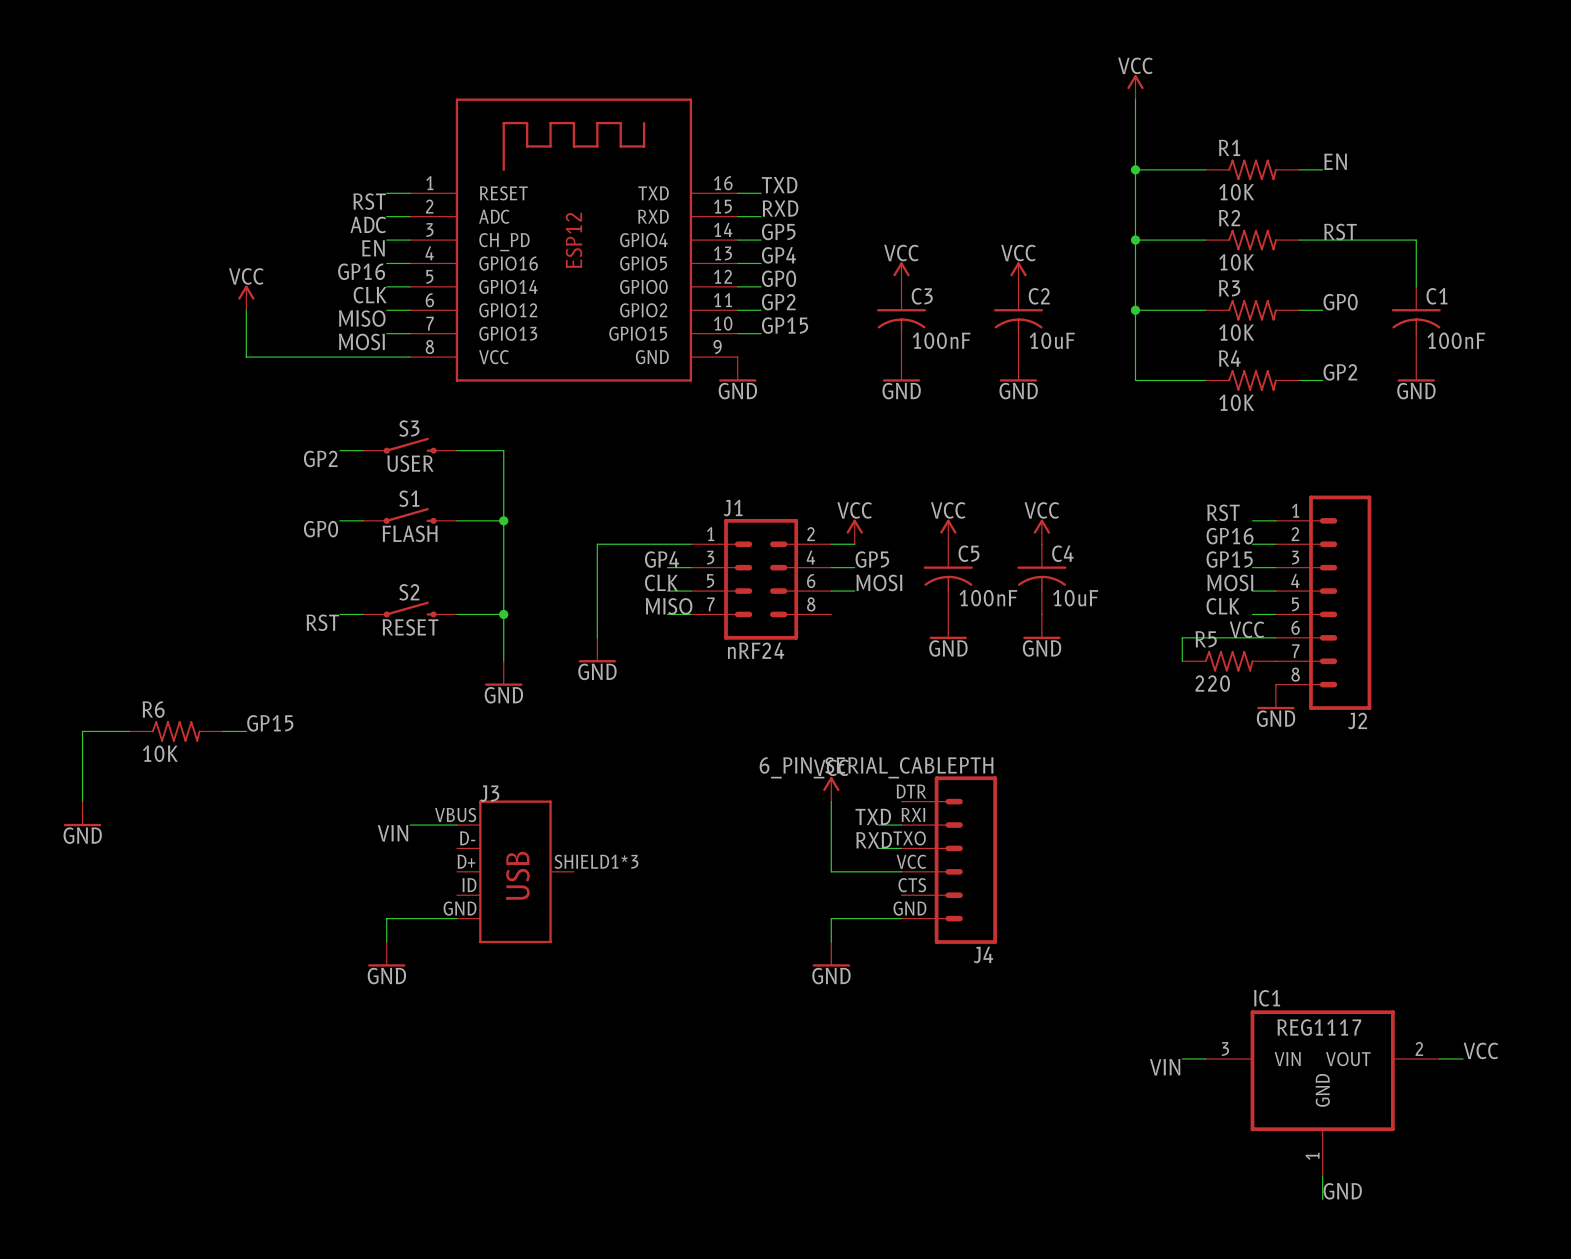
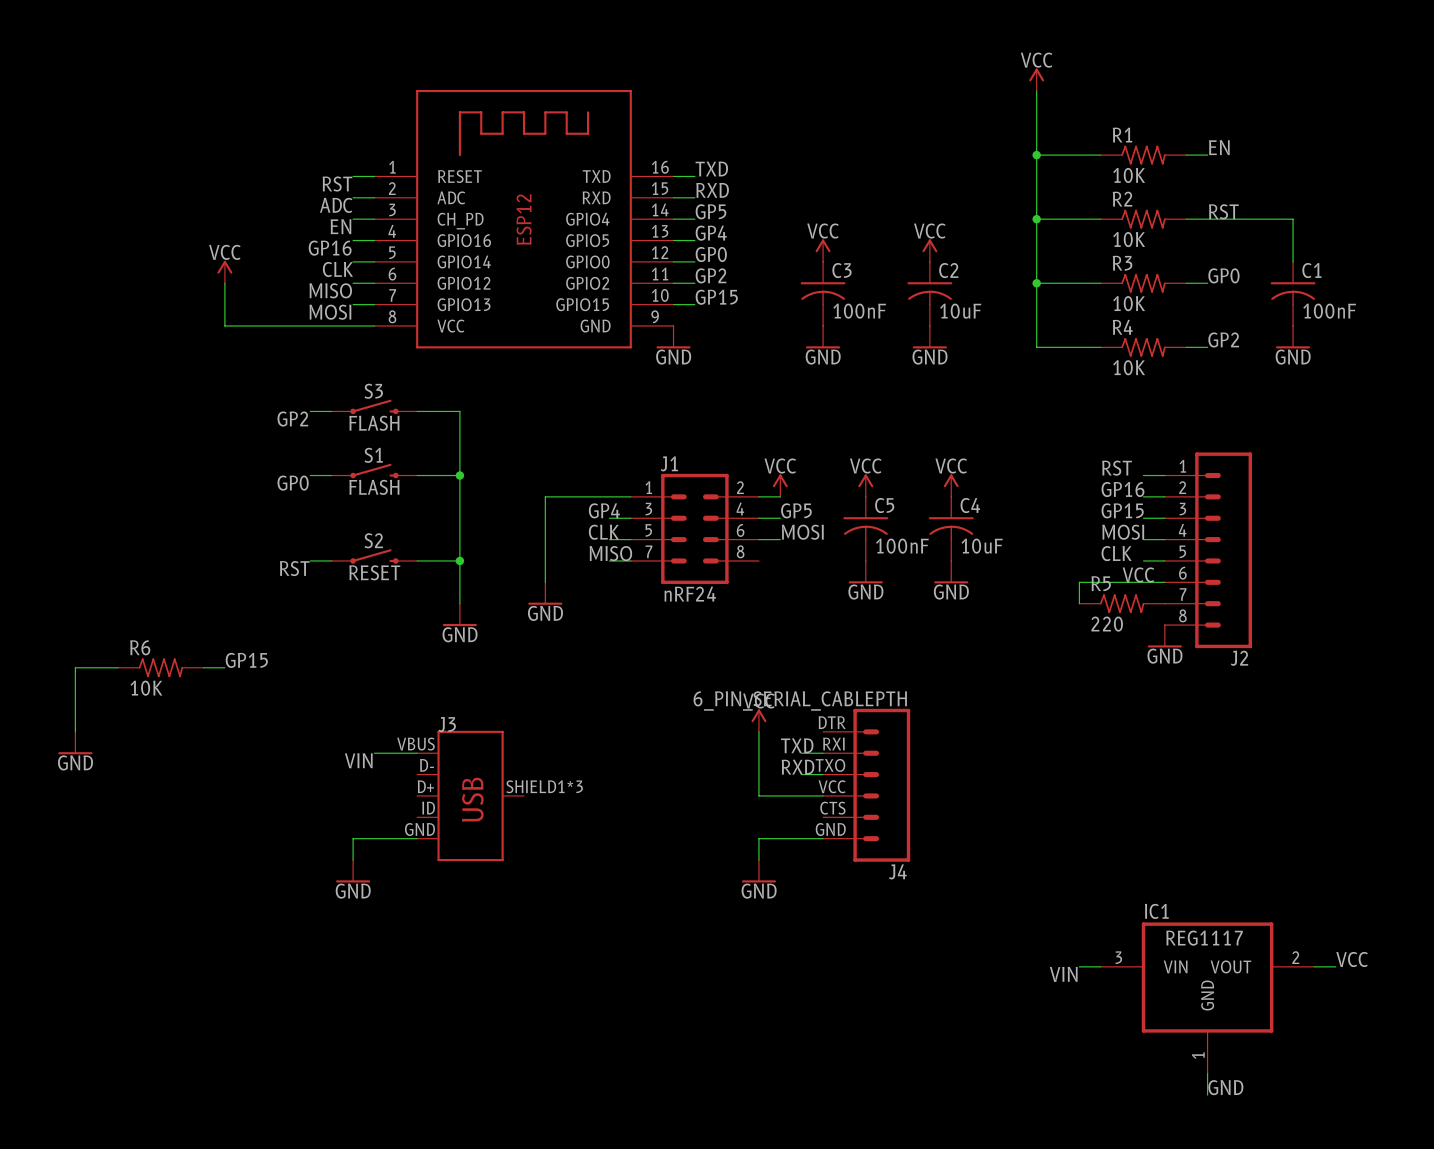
S3 value: USER (410, 463) -> FLASH (374, 423)

